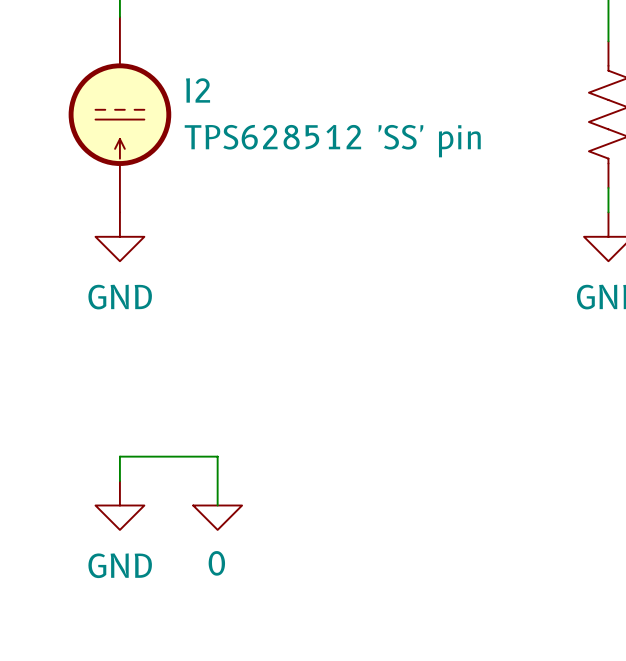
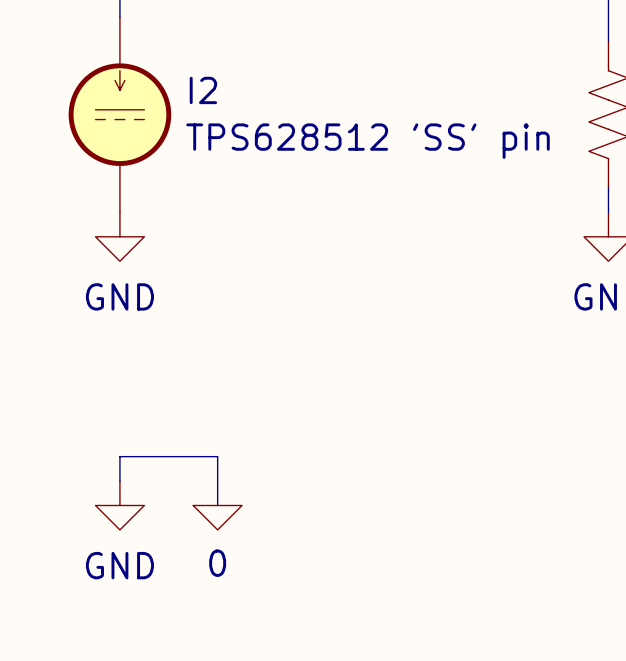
I2 rotation: 0° (119, 114) -> 180° (119, 114)

